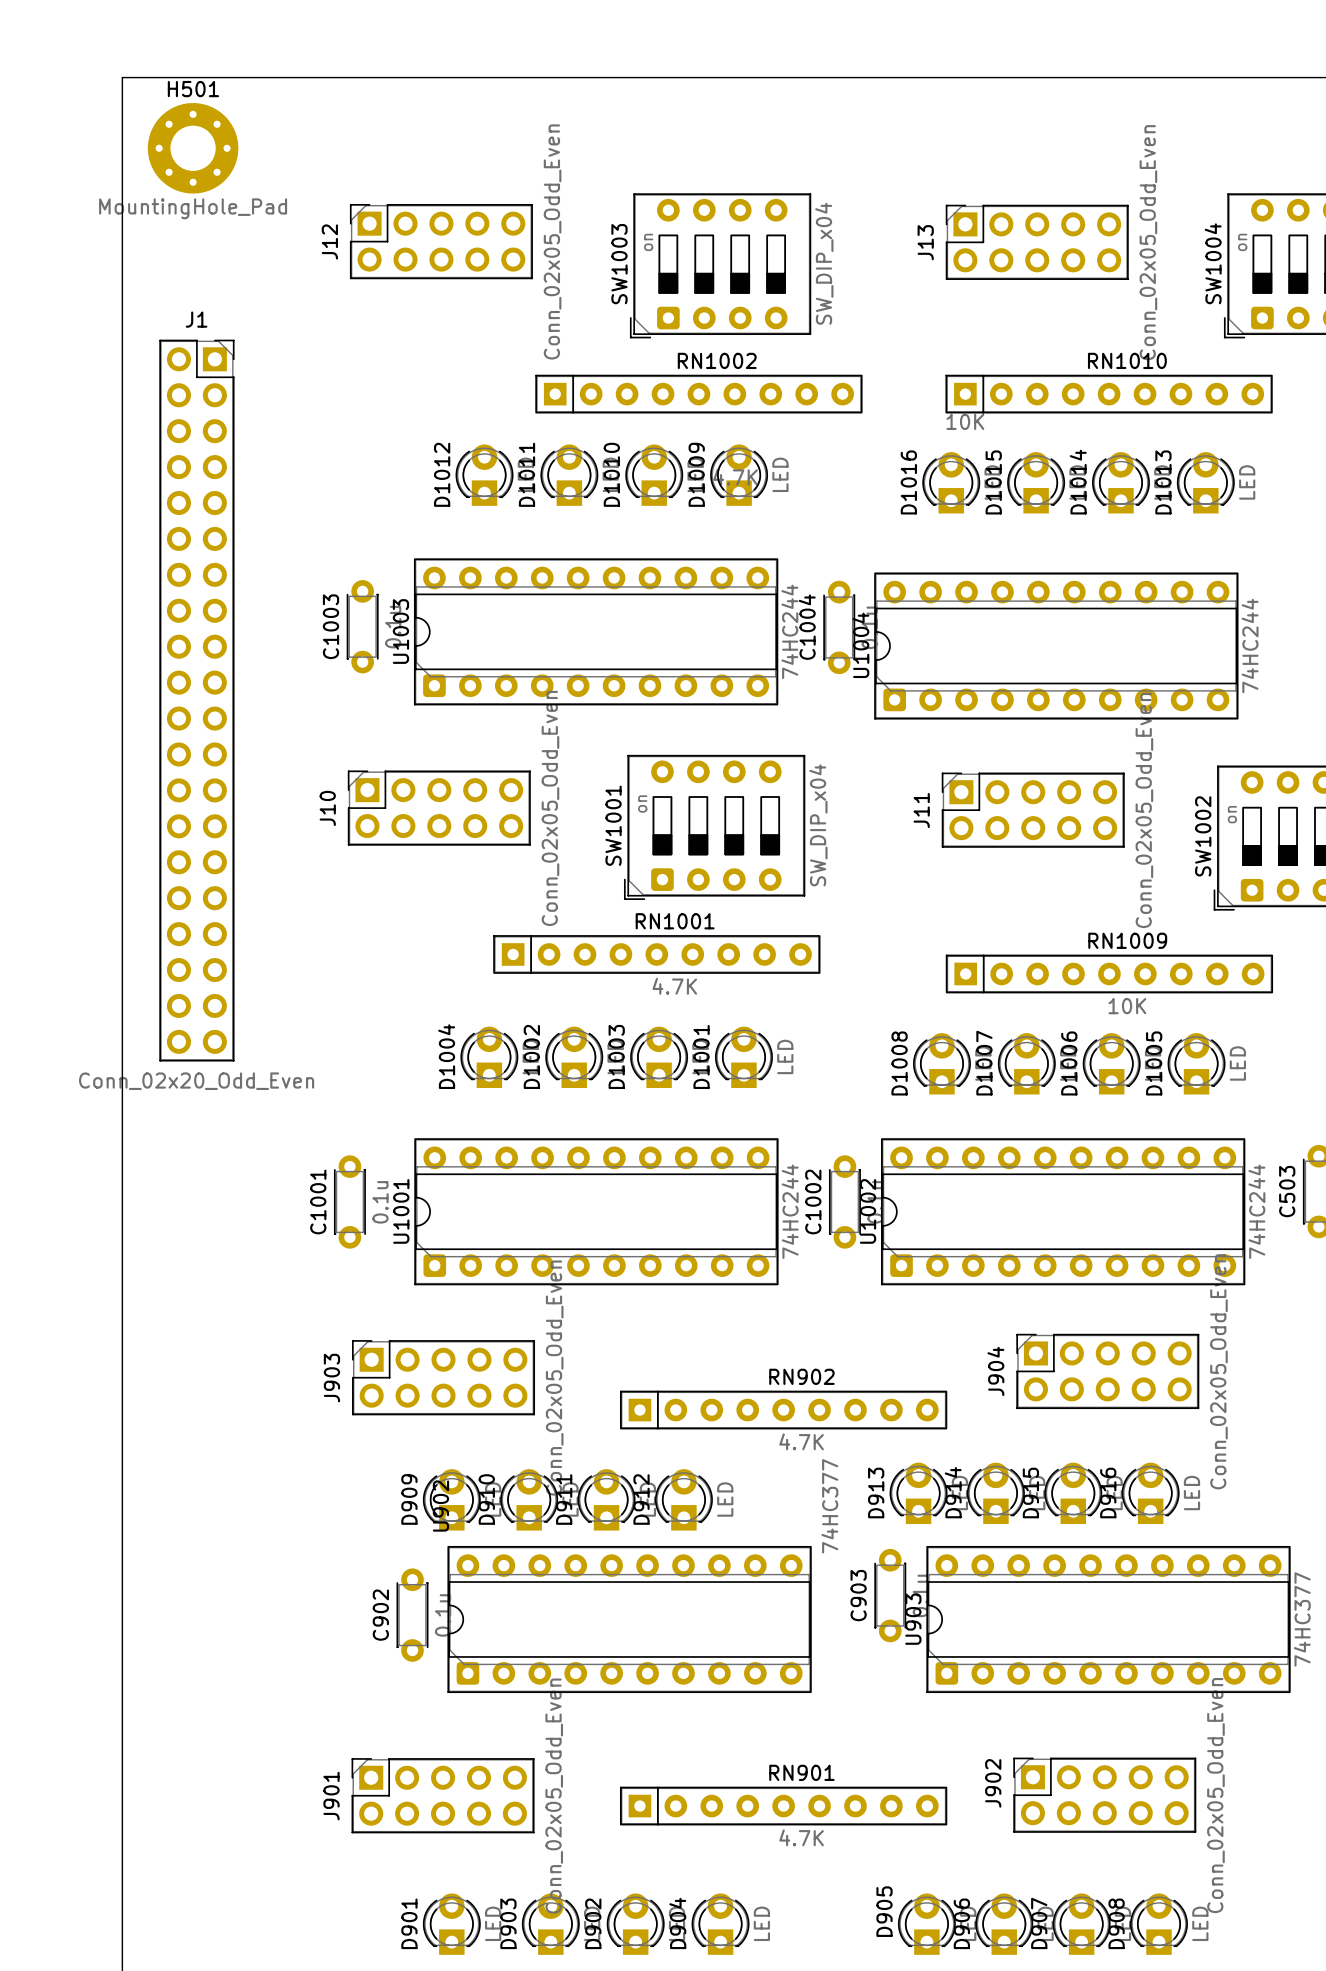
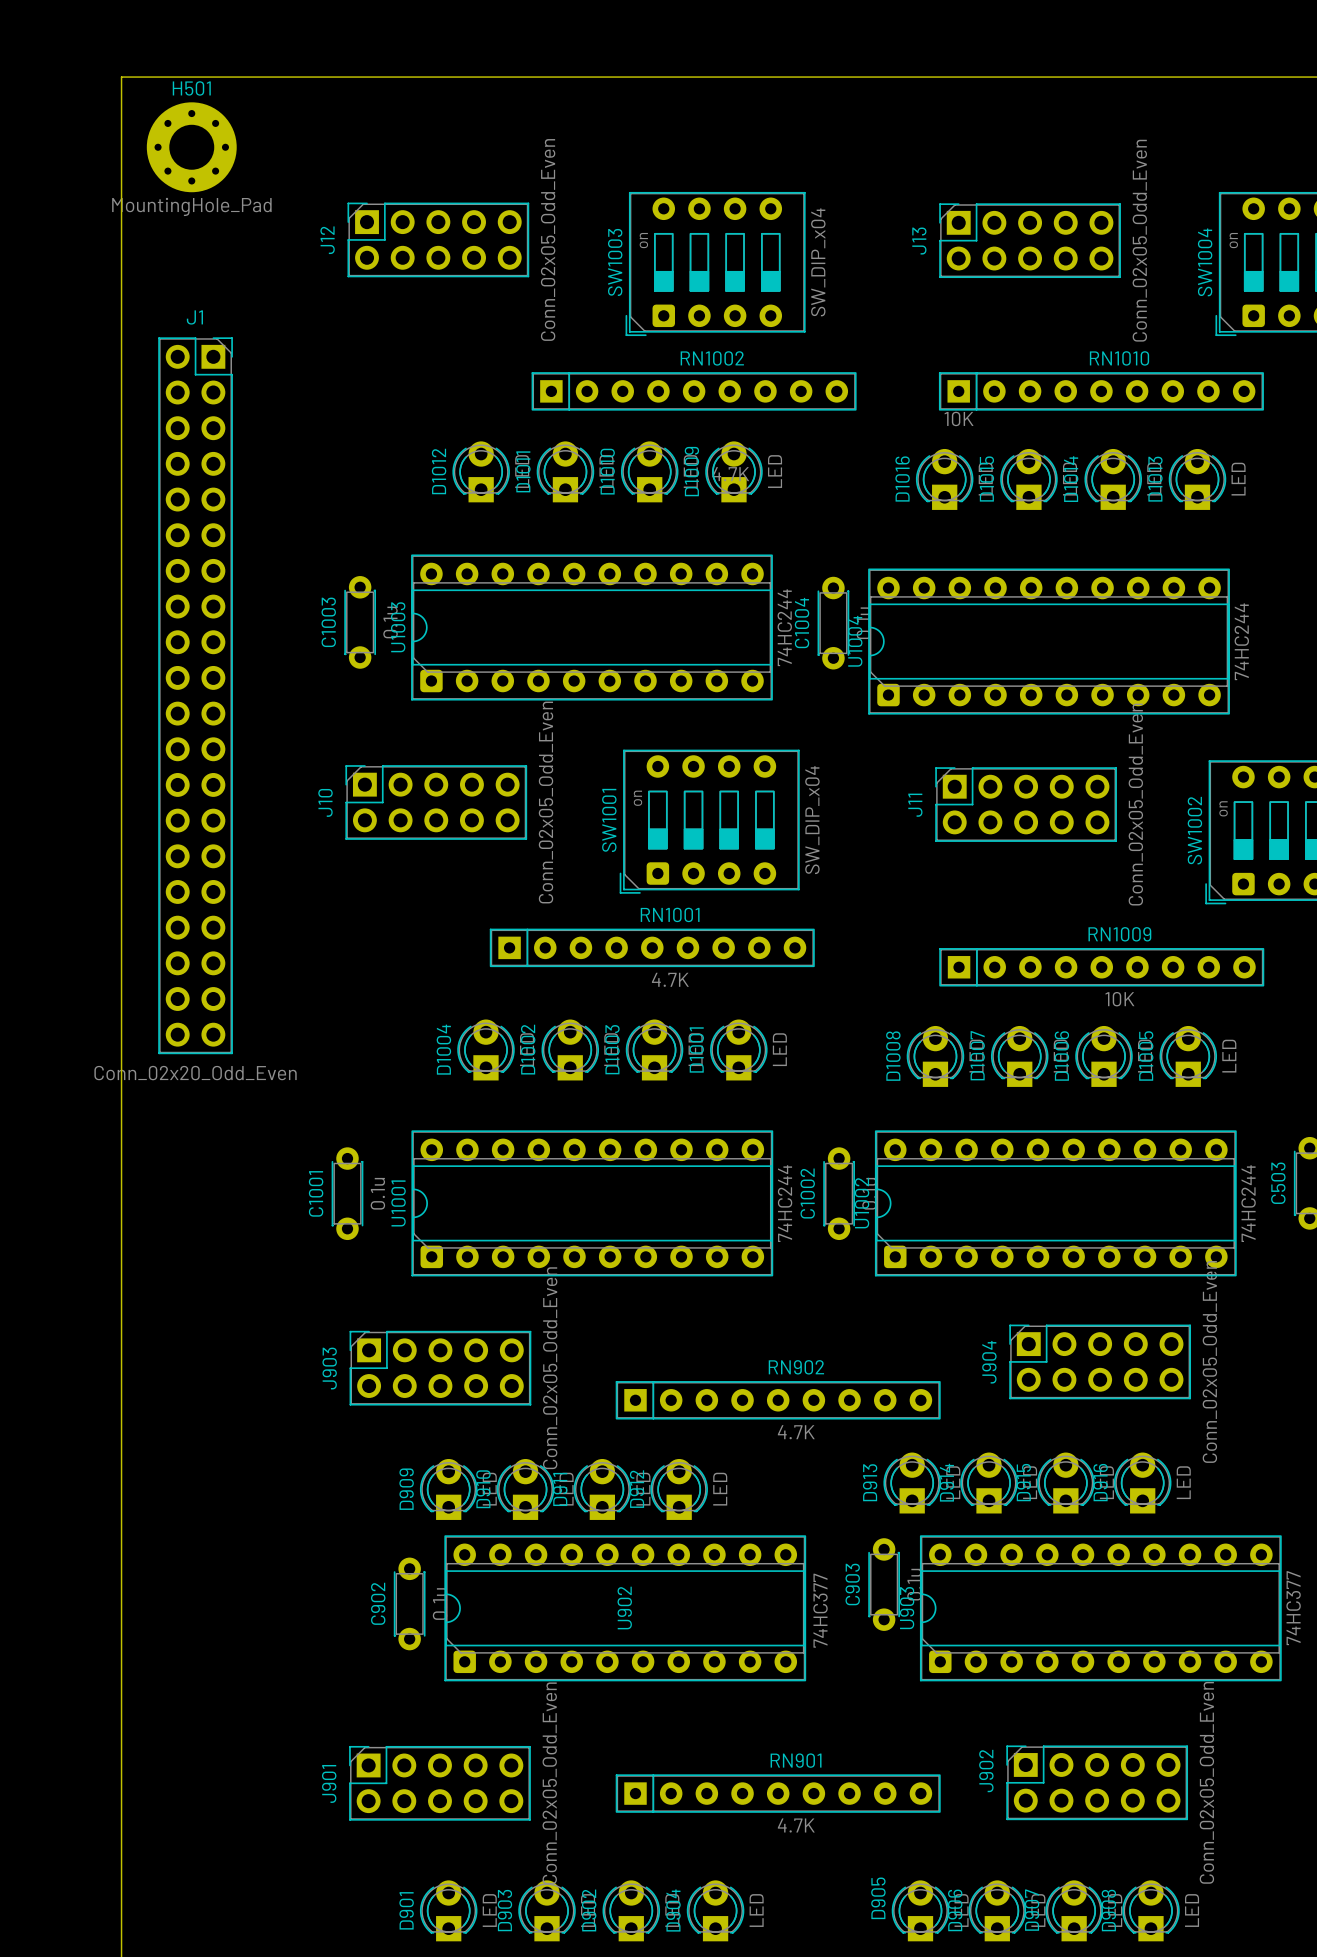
U902 name position: U902 (440, 1506) -> U902 (624, 1608)
U902 value position: 74HC377 (829, 1506) -> 74HC377 (820, 1610)

